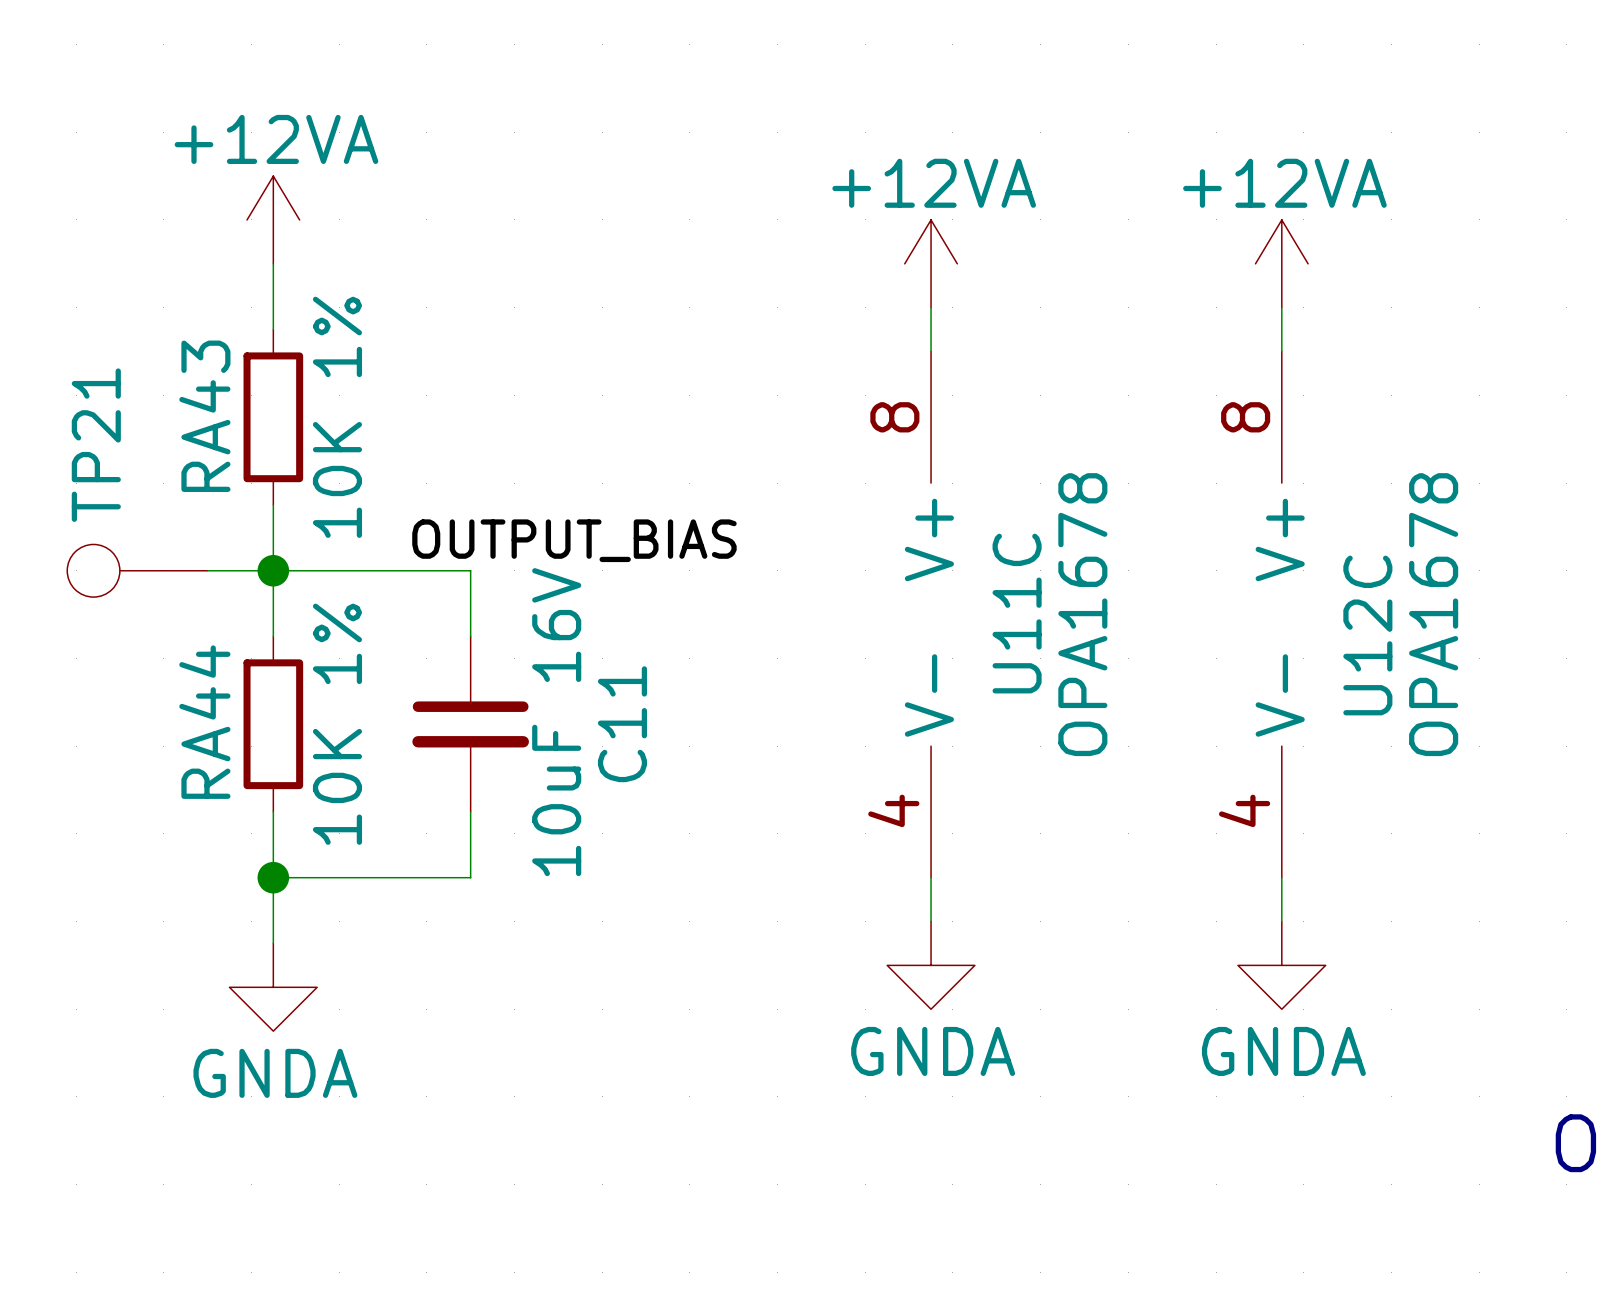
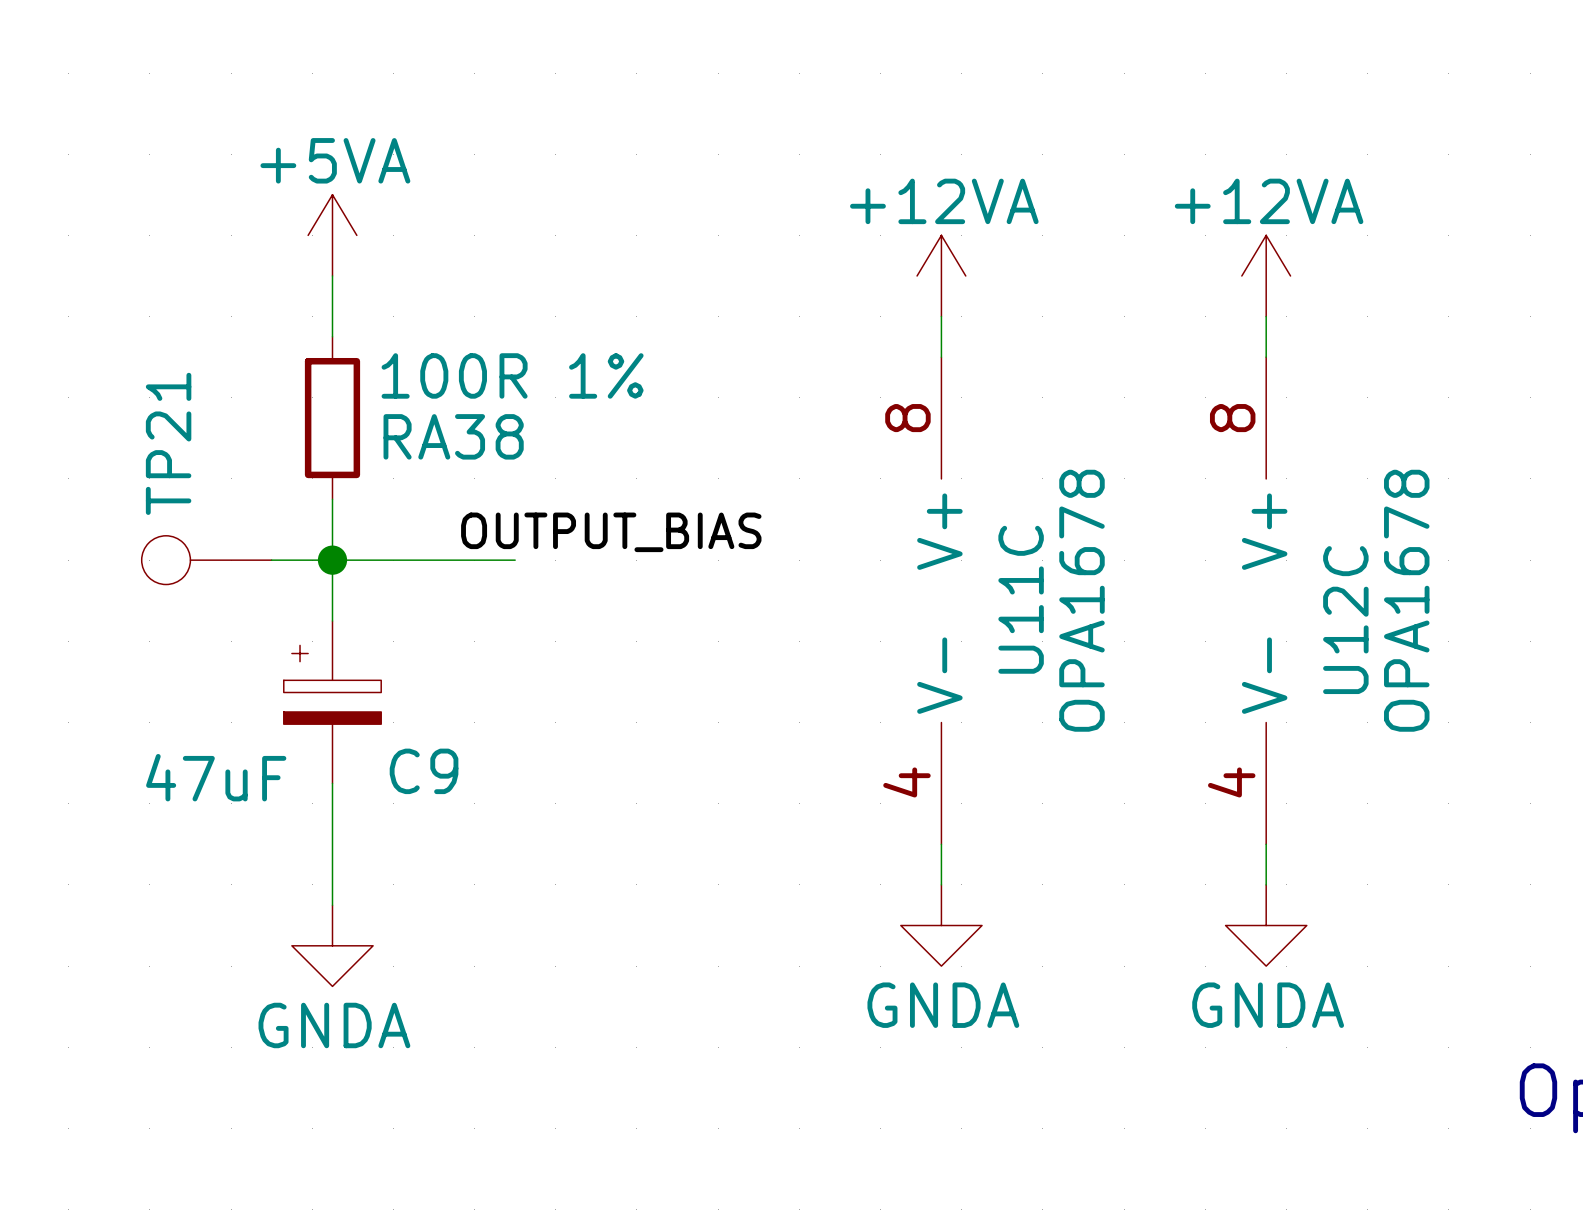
power symbol: +12VA (273, 219) -> +5VA (332, 235)
RA43 name: RA43 (204, 416) -> RA38 (453, 436)
RA43 value: 10K 1% (337, 417) -> 100R 1% (512, 375)
wire: (470, 570) (470, 636) -> none
RA44: 10K 1% (273, 724) -> none
C9: none -> 47uF (332, 702)
C11: 10uF 16V (470, 724) -> none
wire: (470, 811) (470, 877) (273, 877) -> none
junction: (273, 877) -> none

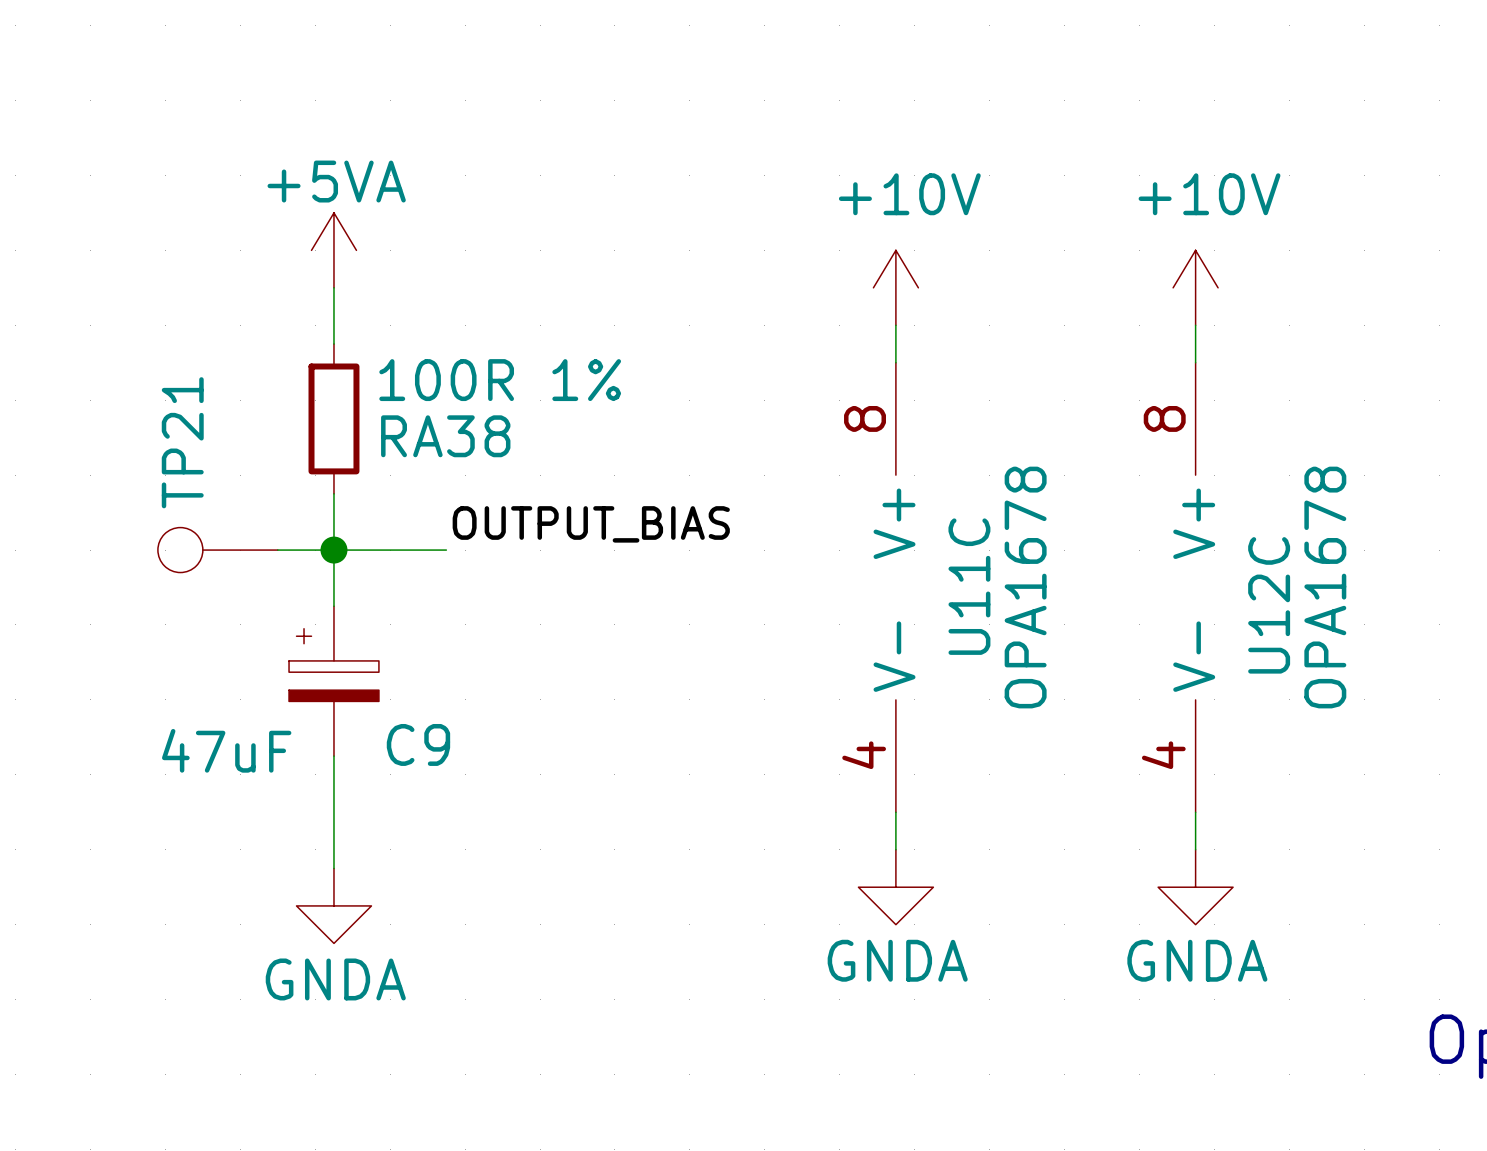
power symbol: +12VA (941, 275) -> +10V (895, 287)
power symbol: +12VA (1266, 275) -> +10V (1195, 287)
wire: (454, 560) (515, 560) -> none

